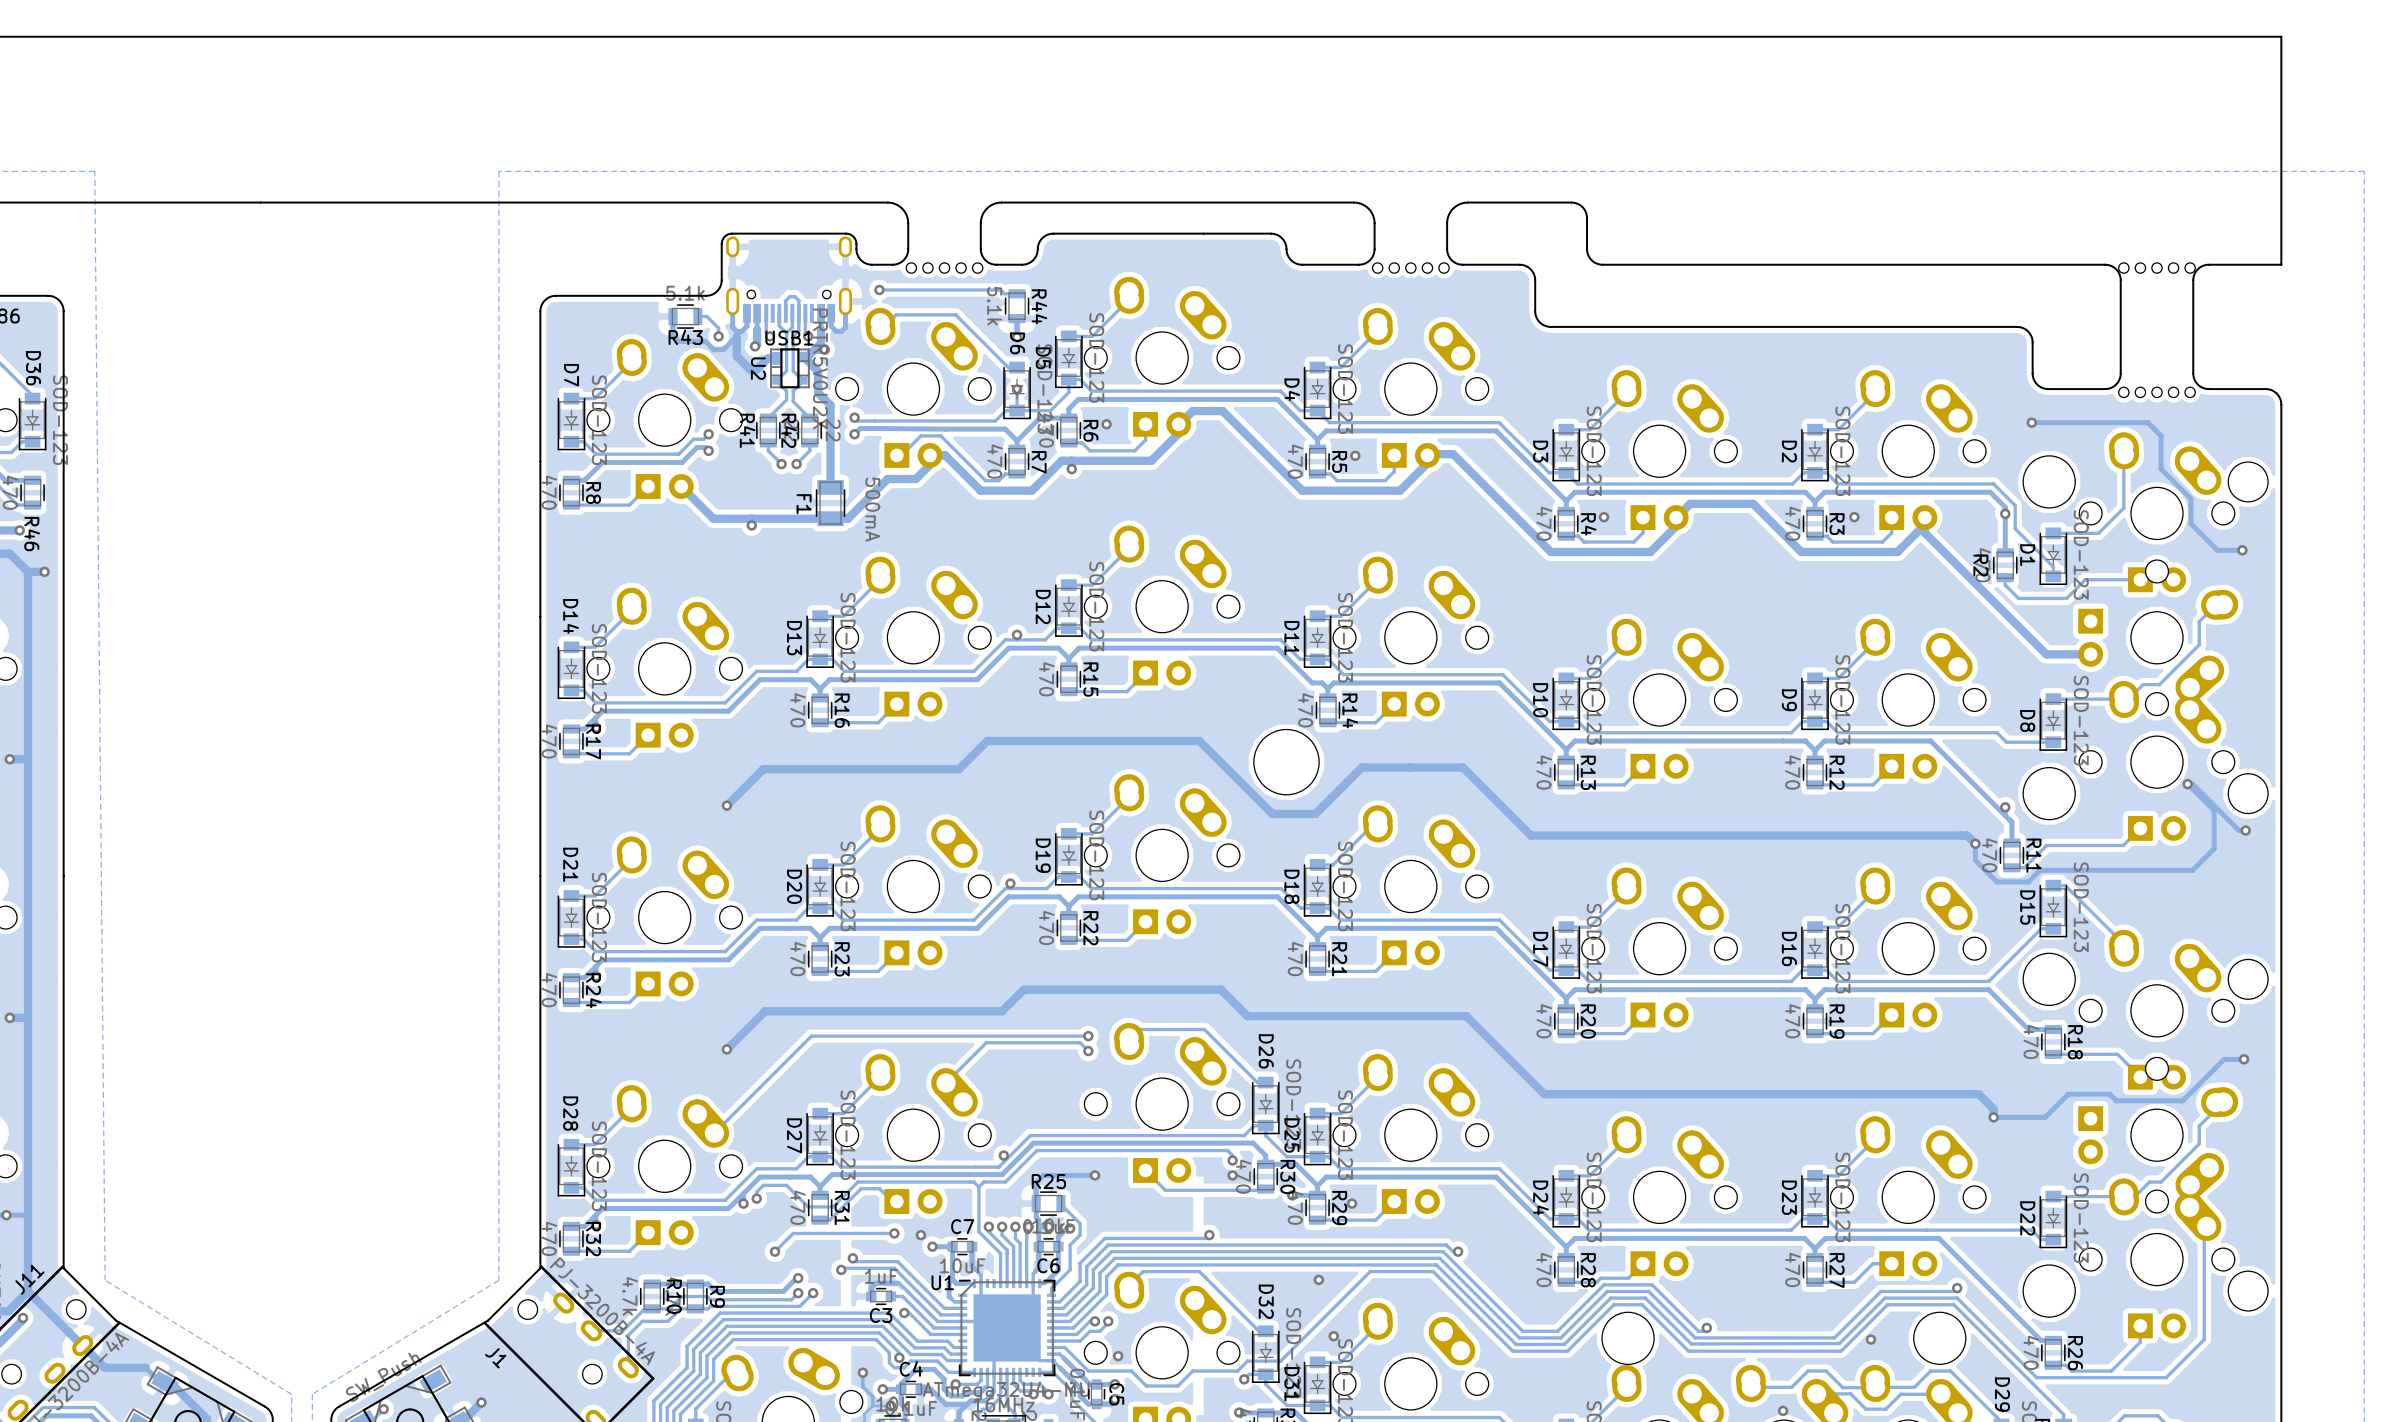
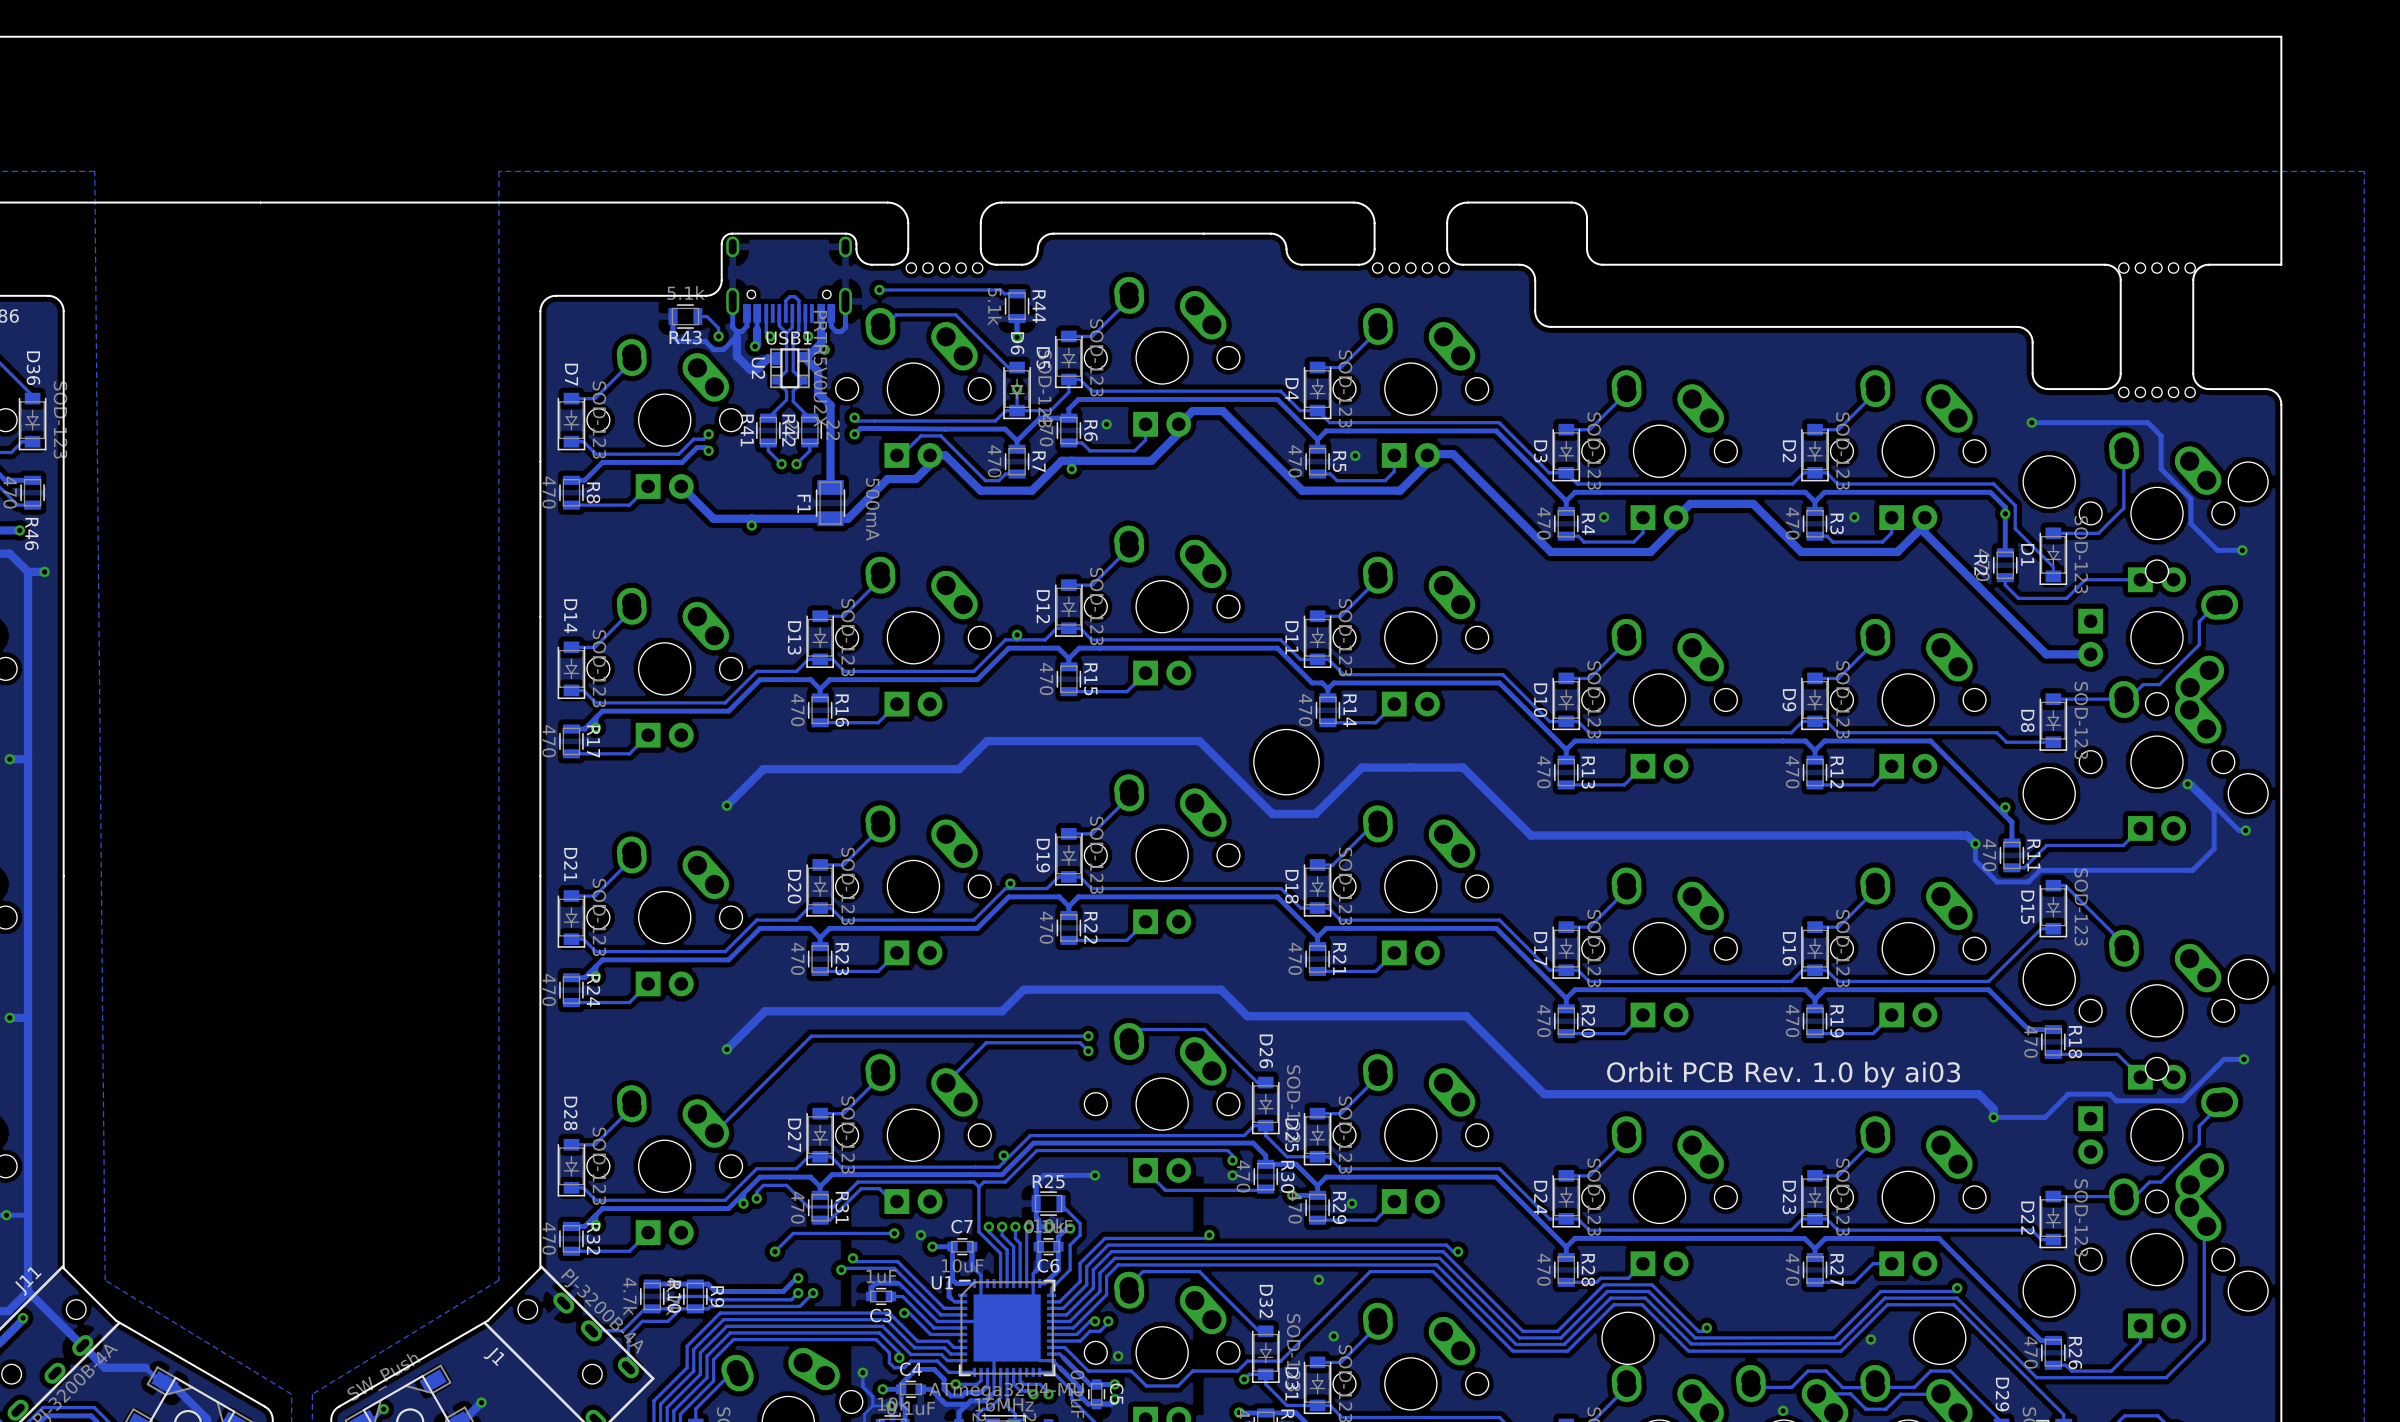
text: none -> Orbit PCB Rev. 1.0 by ai03 (1783, 1074)

